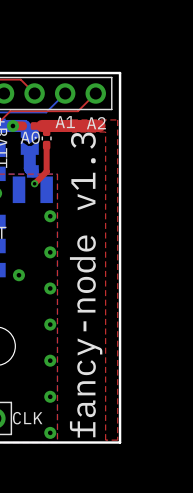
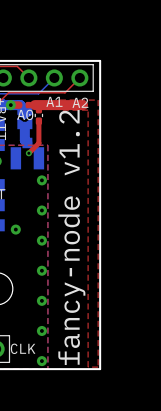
text: fancy-node v1.3 (86, 285) -> fancy-node v1.2 (71, 237)

